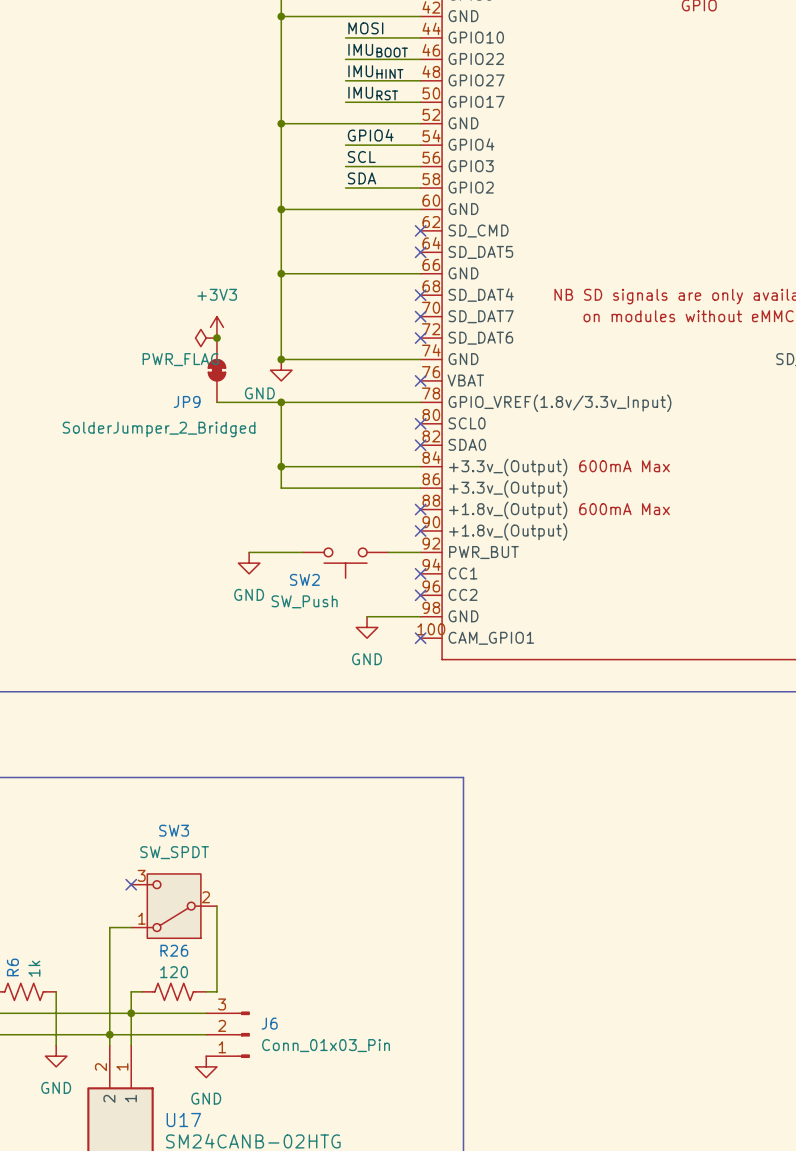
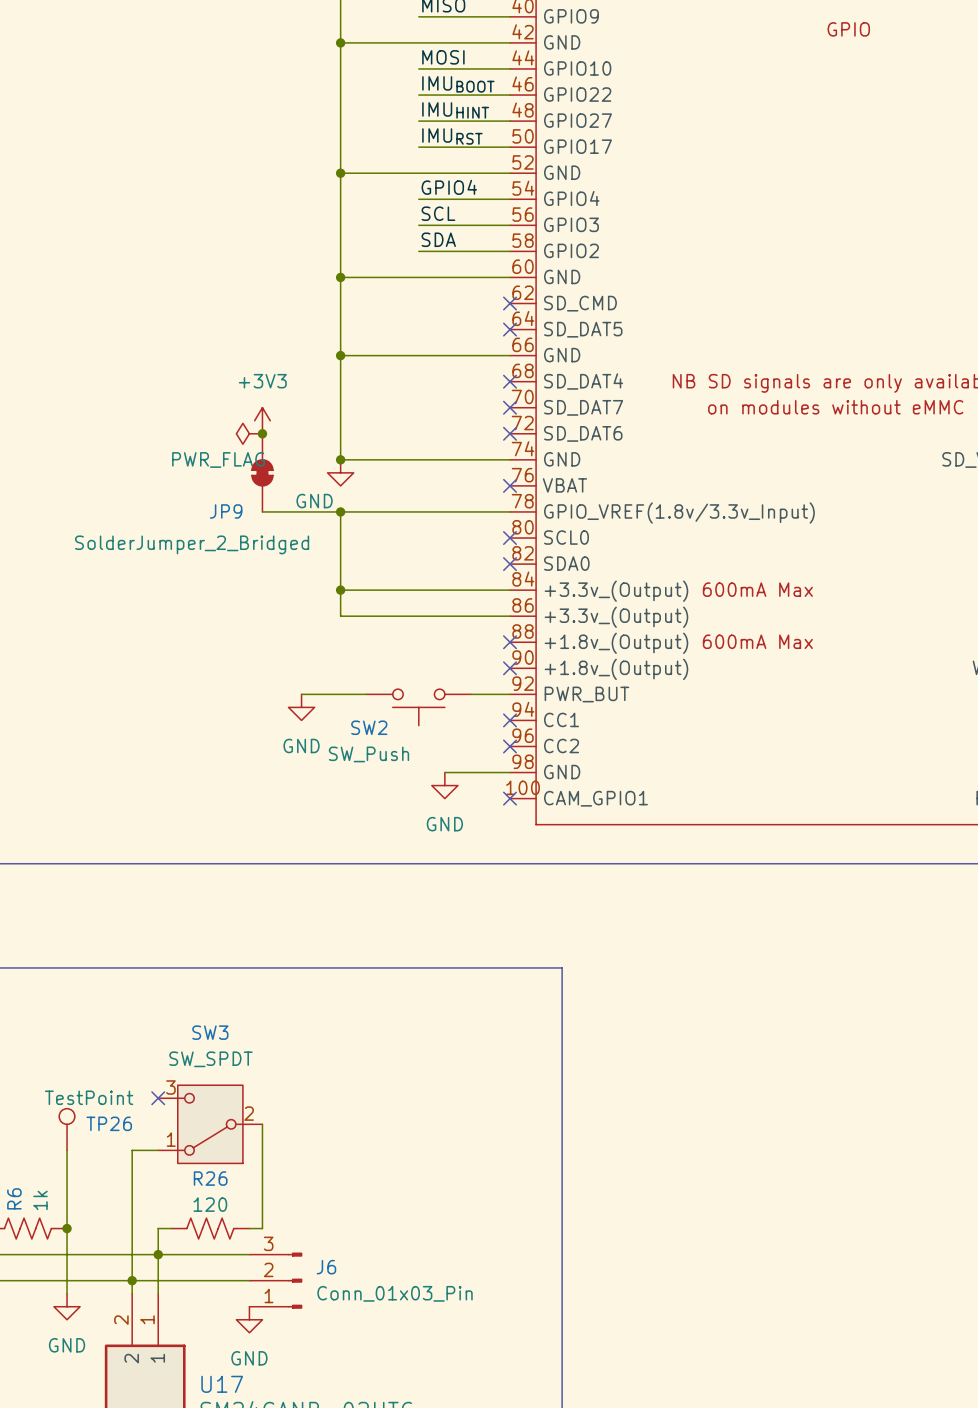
TP26: none -> TestPoint (67, 1129)
wire: none -> (67, 1150) (67, 1228)
junction: none -> (67, 1228)

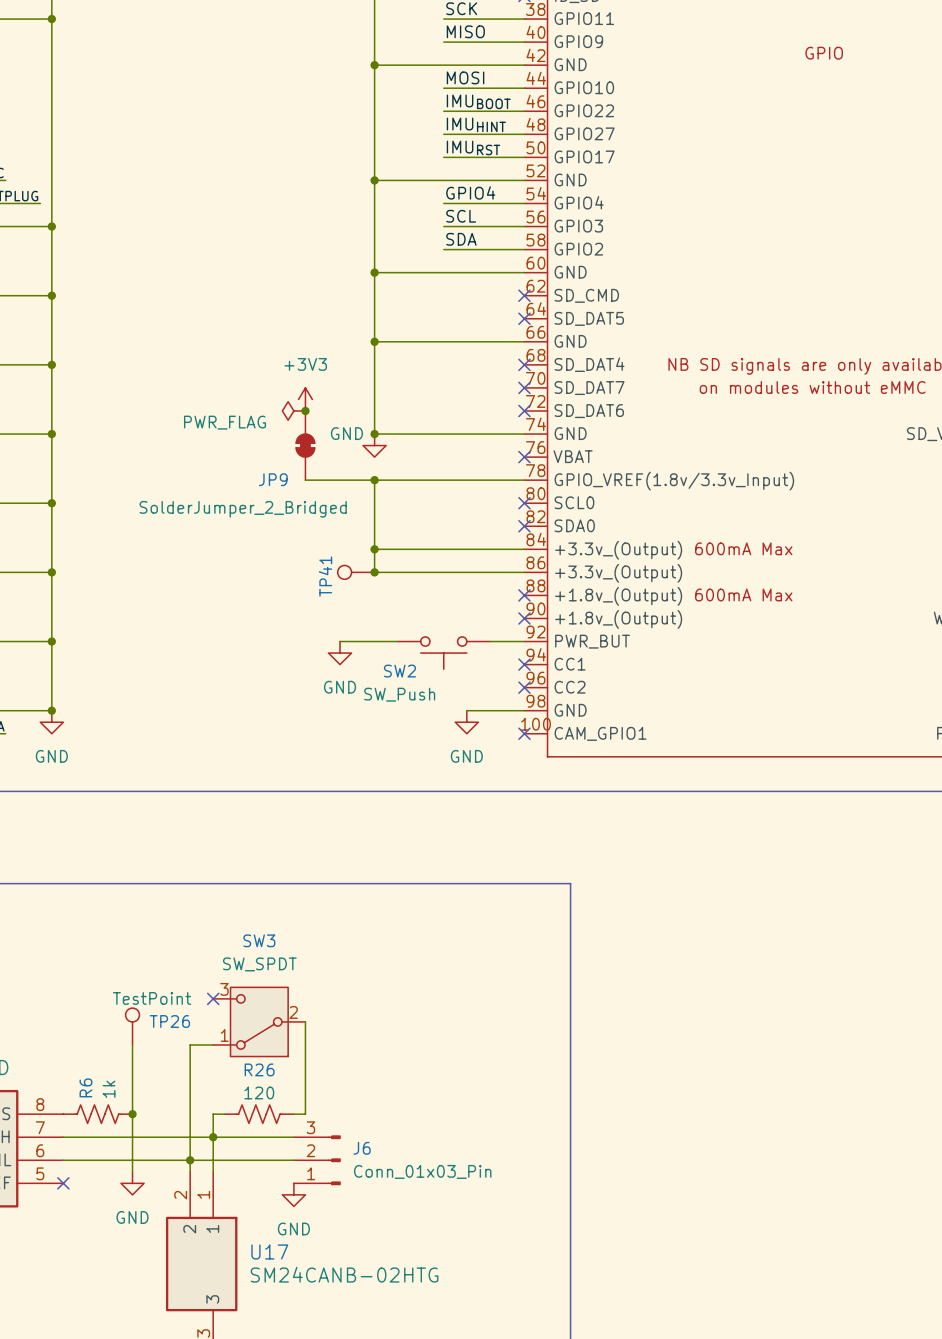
power symbol text position: PWR_FLAG (218, 459) -> PWR_FLAG (225, 422)
power symbol text position: GND (314, 501) -> GND (346, 433)
TP41: none -> (356, 572)
junction: none -> (374, 572)

